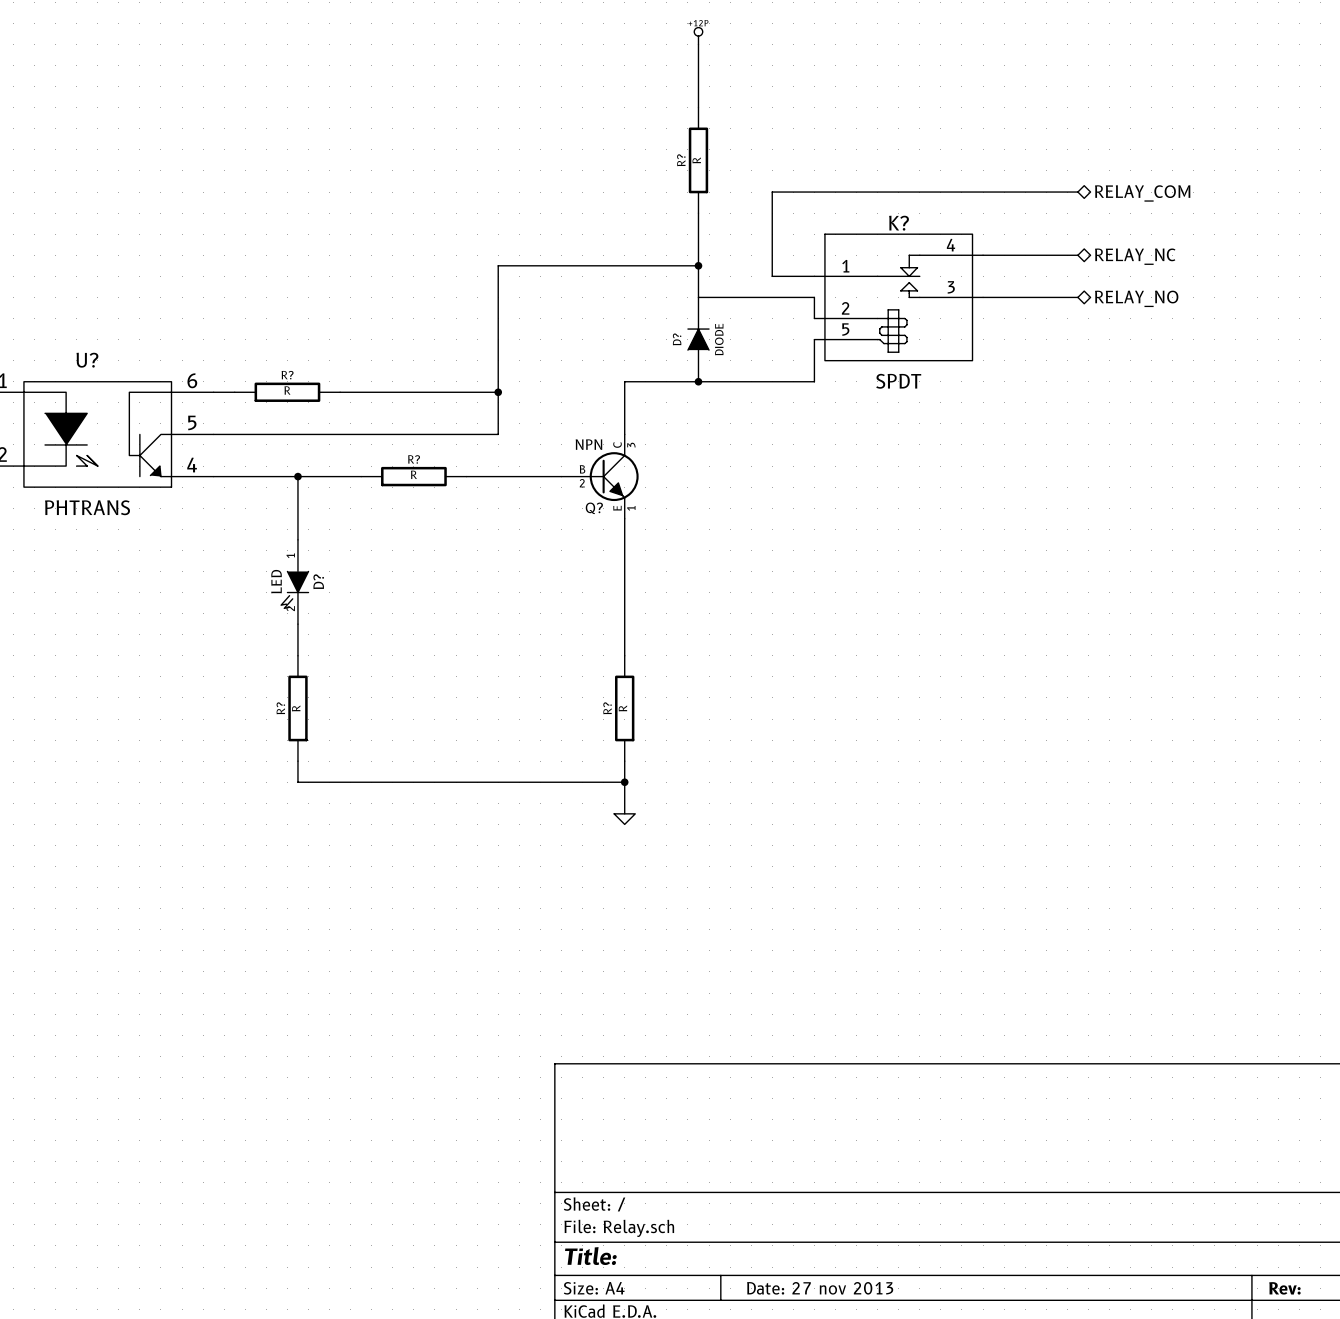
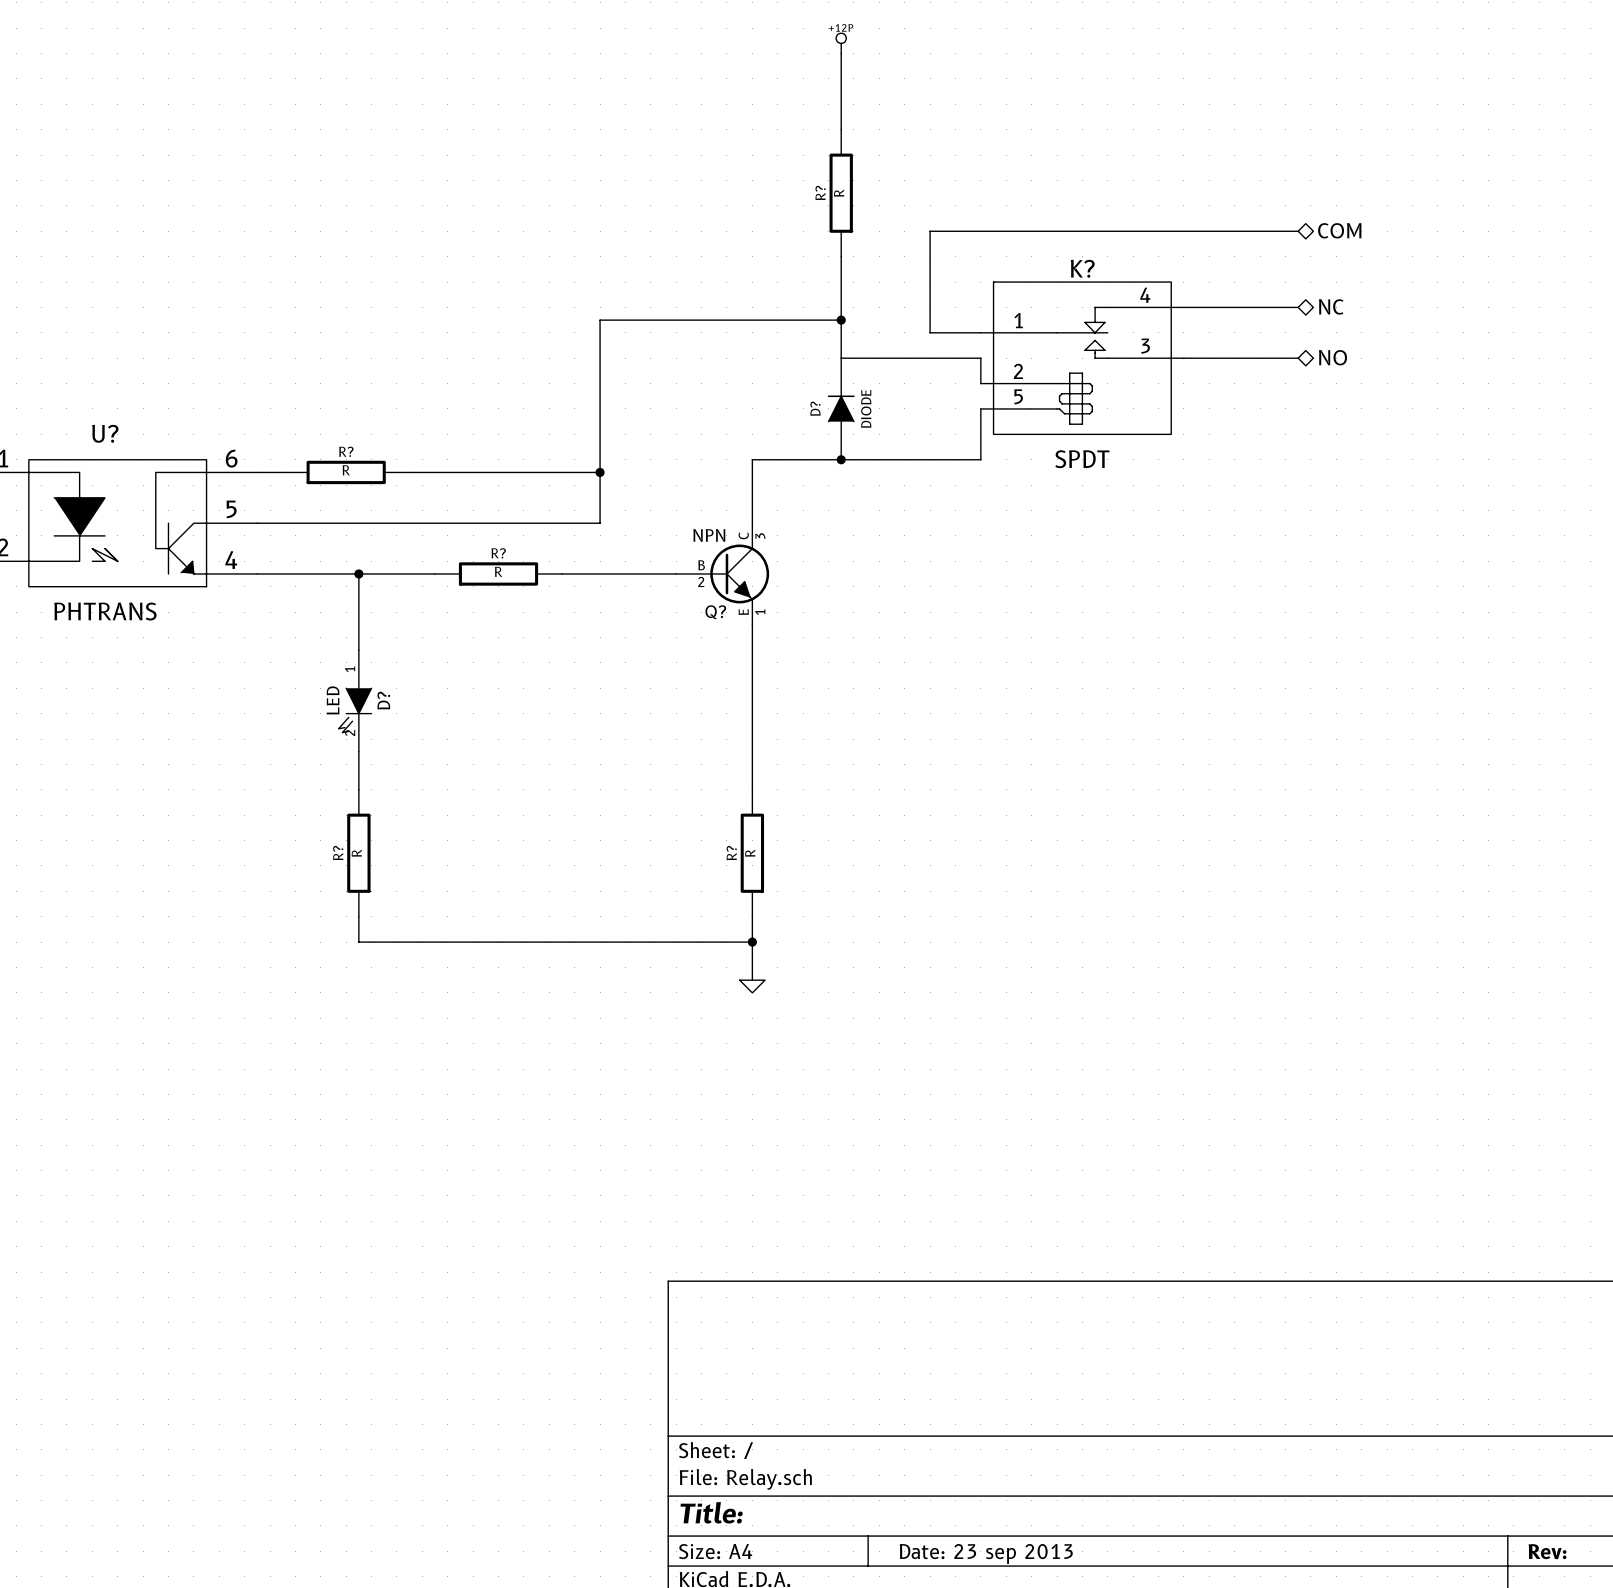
hierarchical label: RELAY_COM (1142, 193) -> COM (1339, 230)
hierarchical label: RELAY_NC (1135, 256) -> NC (1331, 306)
hierarchical label: RELAY_NO (1136, 298) -> NO (1332, 357)
title block: Date: 27 nov 2013 (820, 1288) -> Date: 23 sep 2013 (986, 1553)

